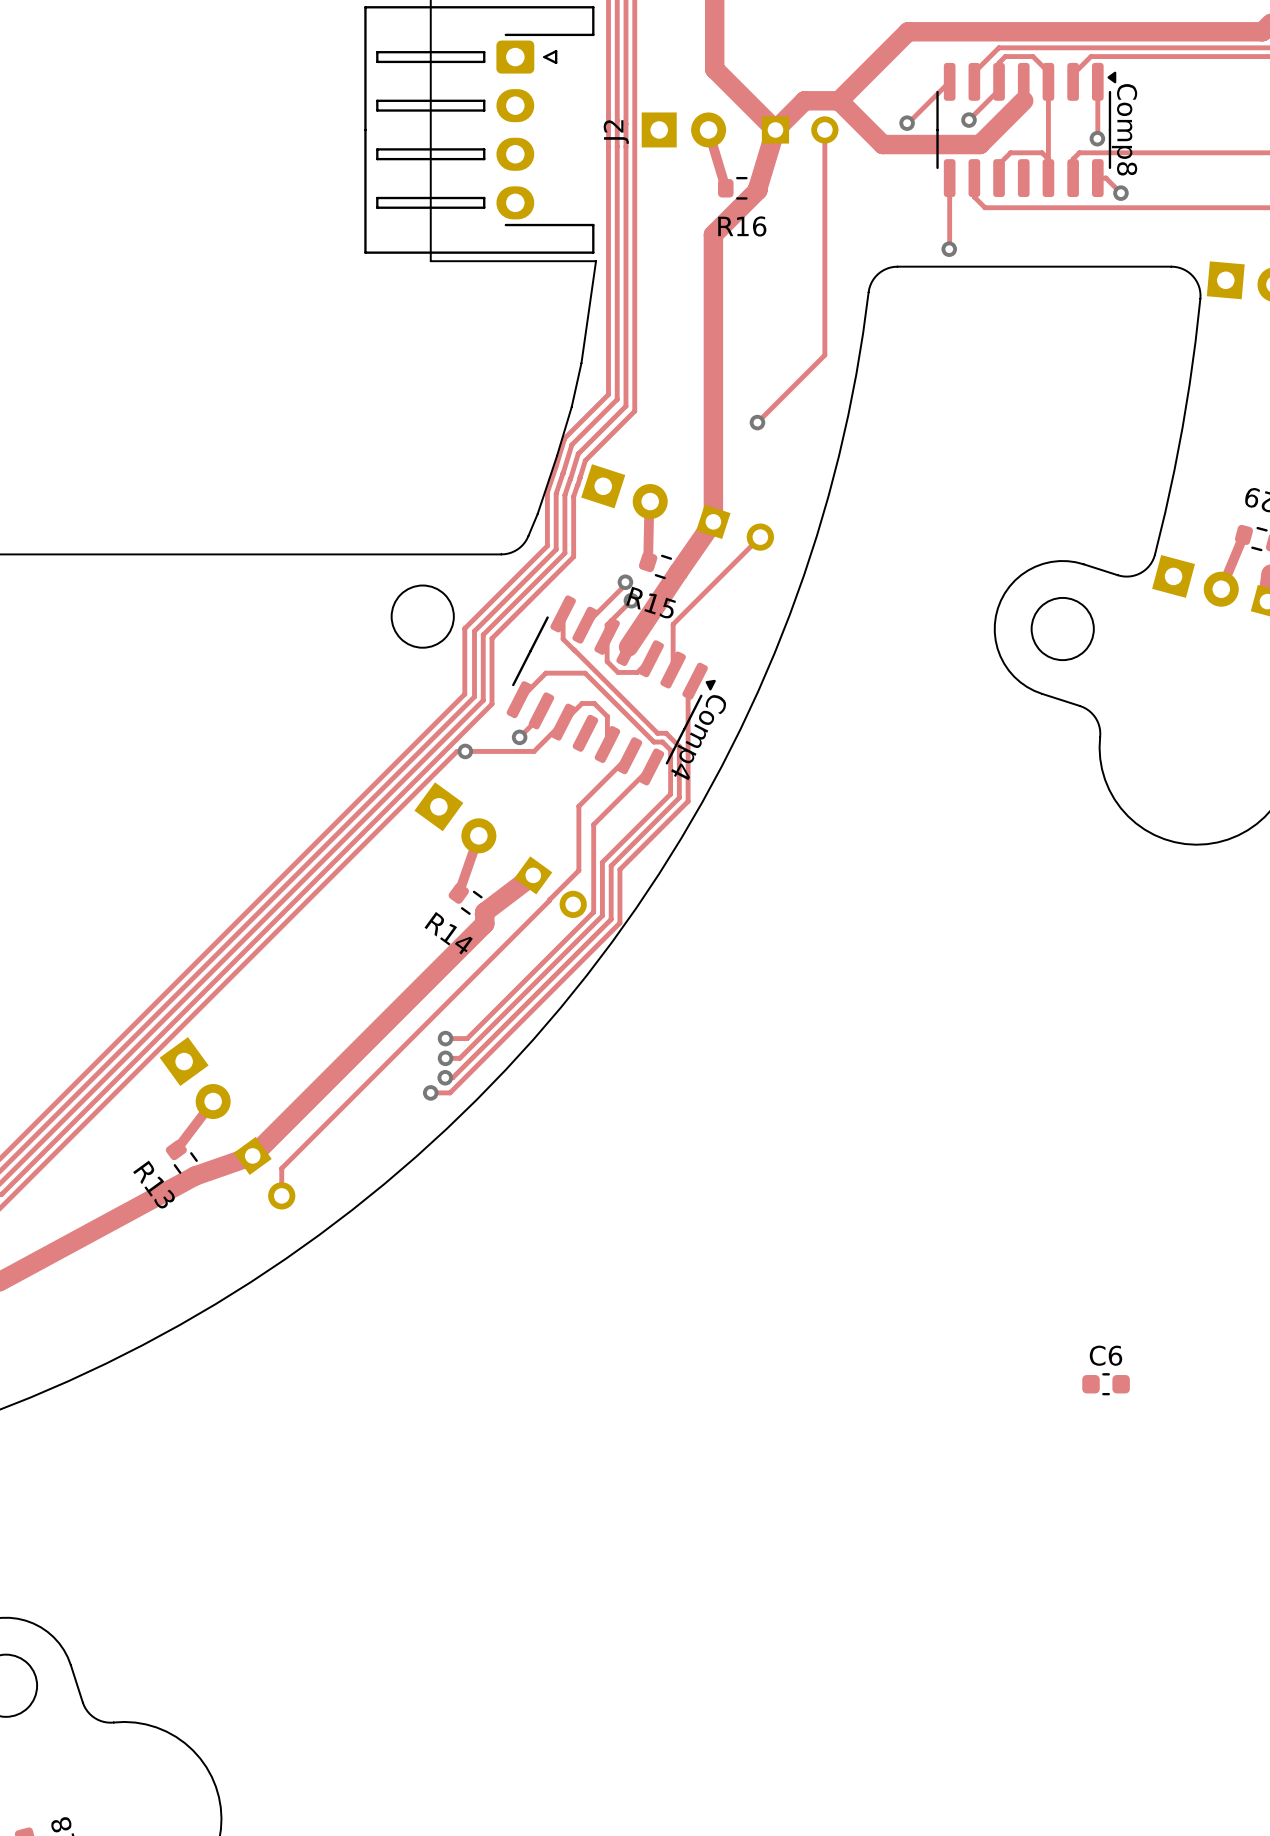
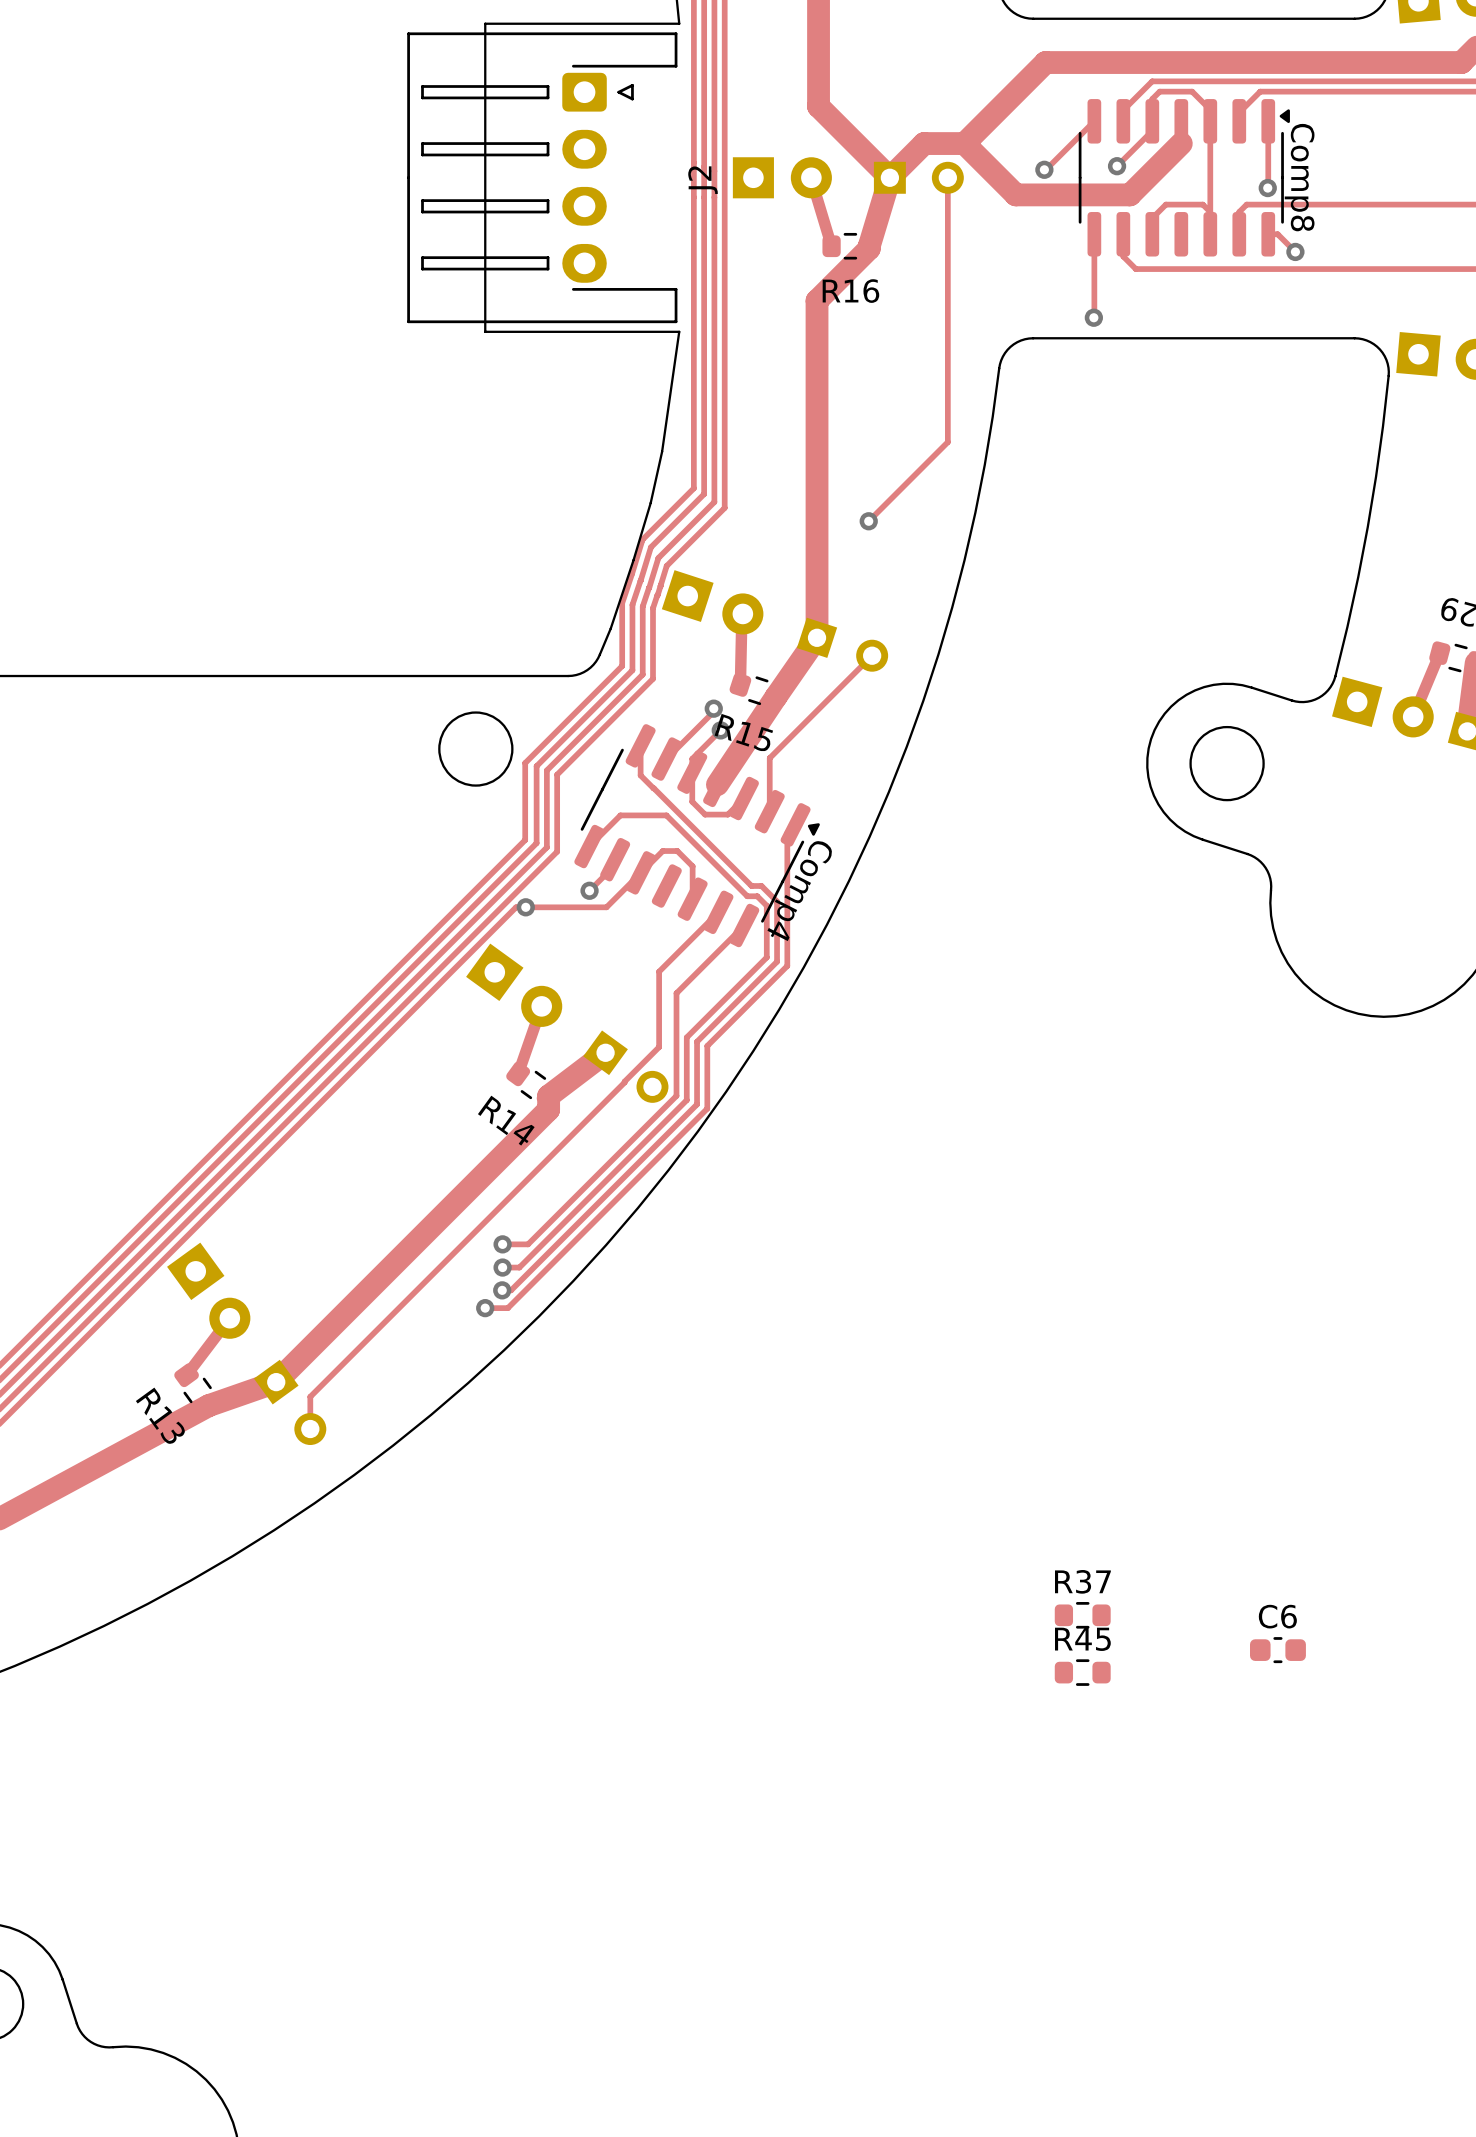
R37: none -> (1082, 1615)
R45: none -> (1082, 1672)

